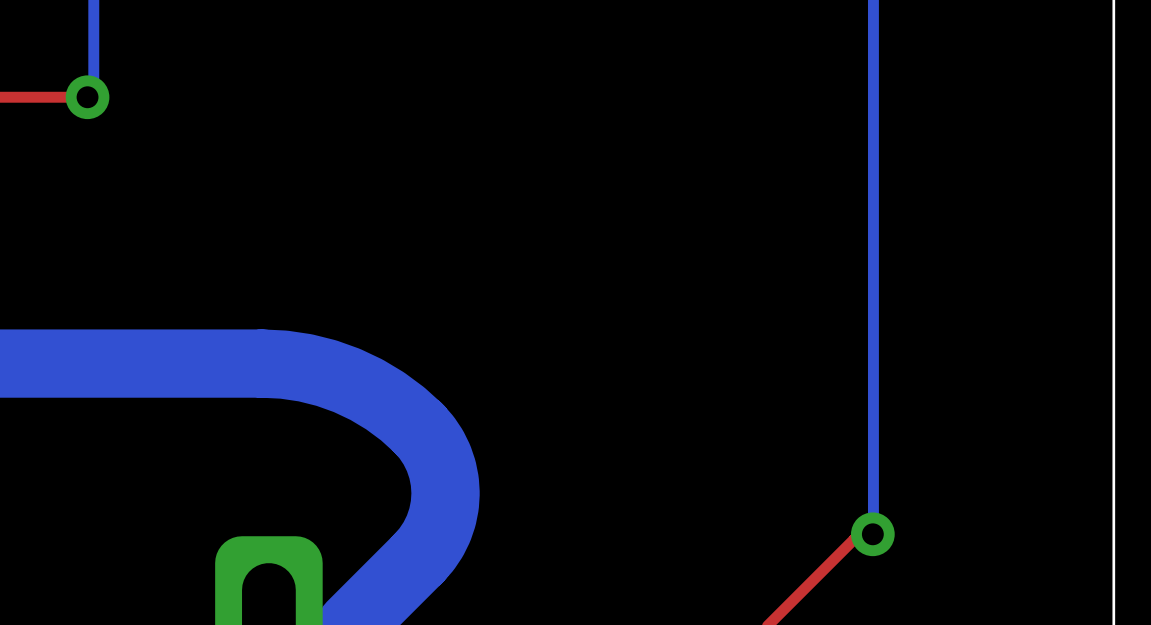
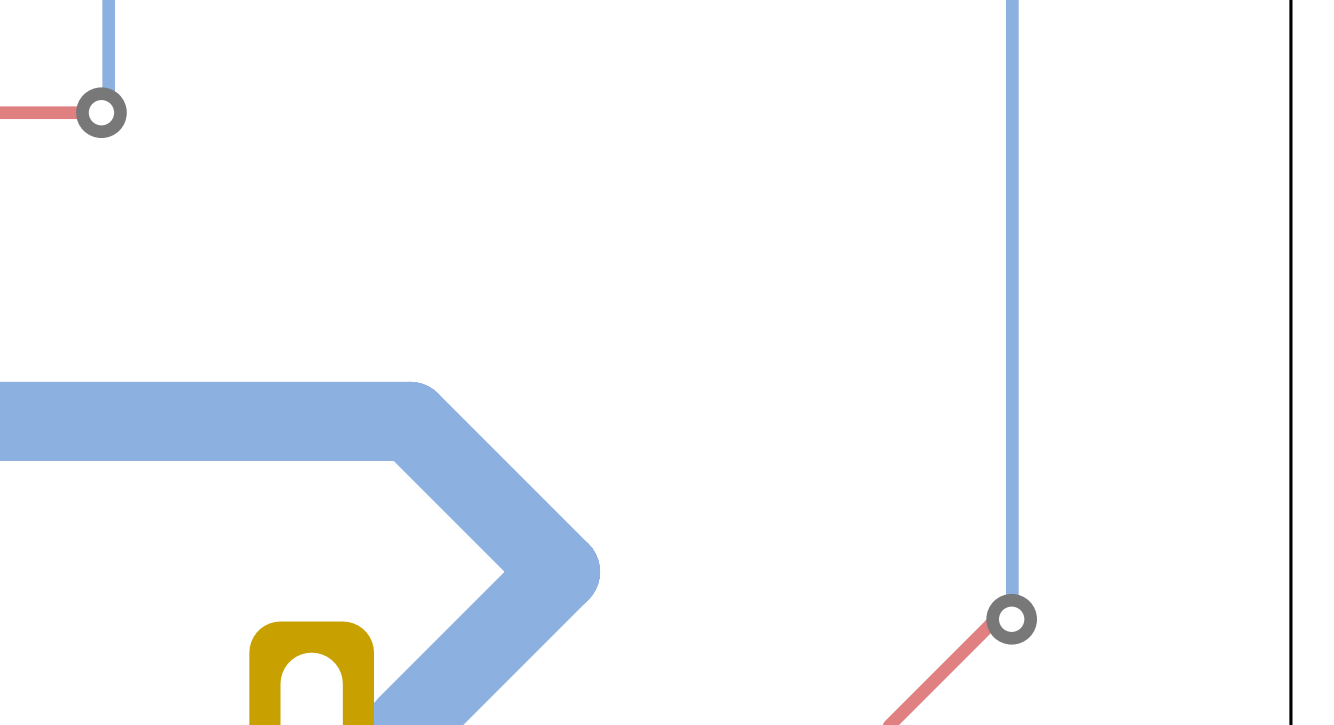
bottom track: (262, 363) (305, 367) (346, 380) (385, 400) (402, 413) (426, 437) (433, 447) (442, 469) (445, 493) (442, 517) (438, 528) (433, 539) (418, 558) -> (303, 421) (410, 421) (560, 571) (485, 646)

